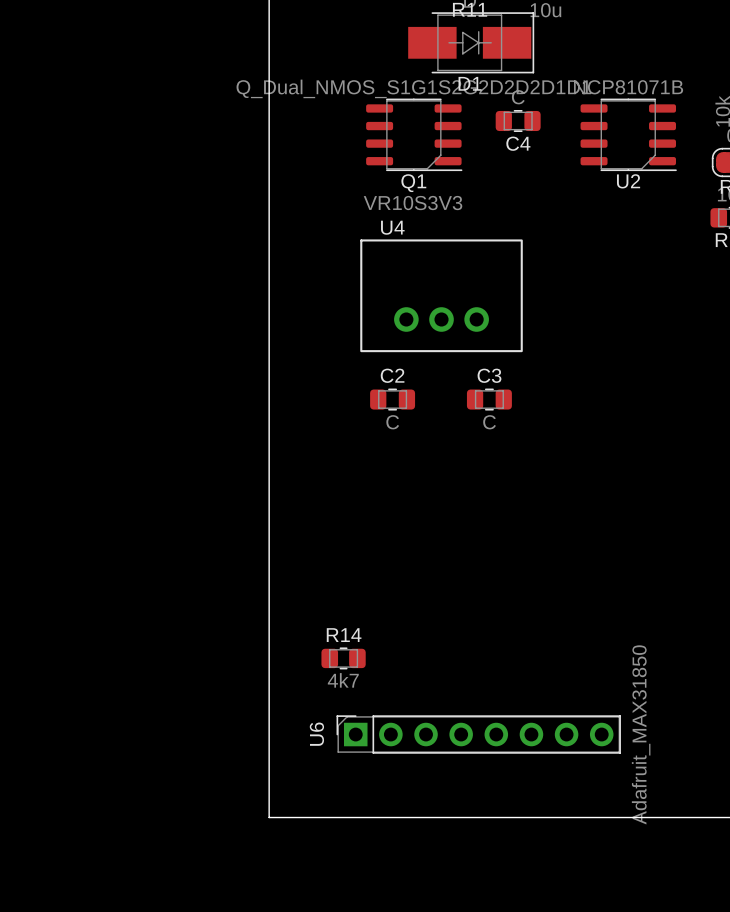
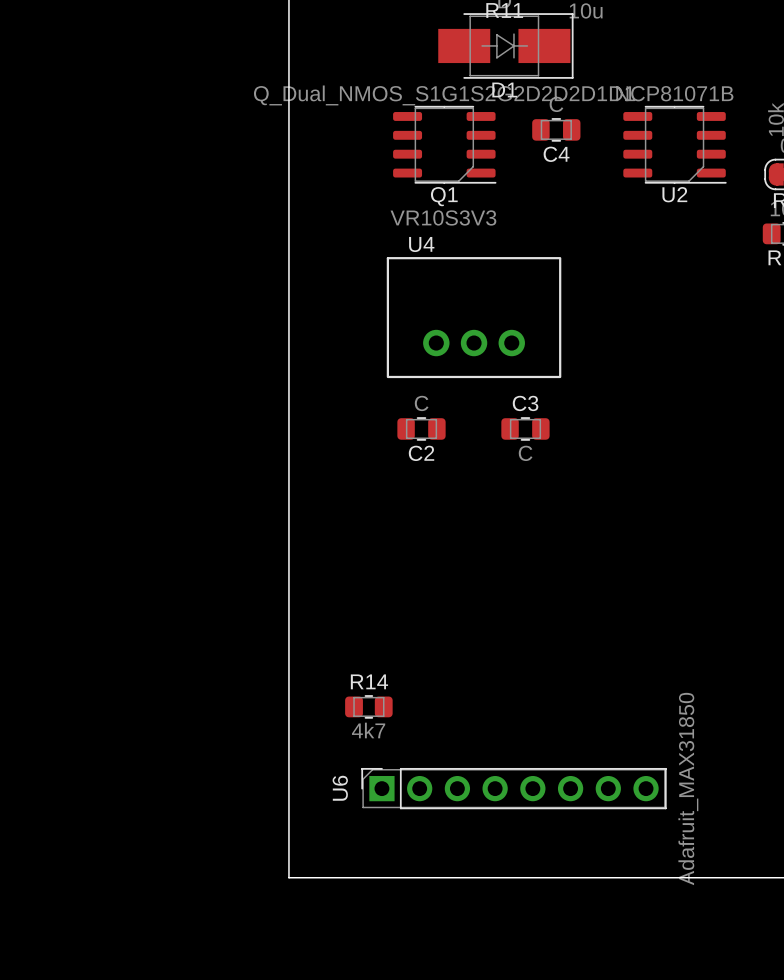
C2 name position: C2 (392, 375) -> C2 (421, 453)
C2 value position: C (392, 422) -> C (421, 403)

